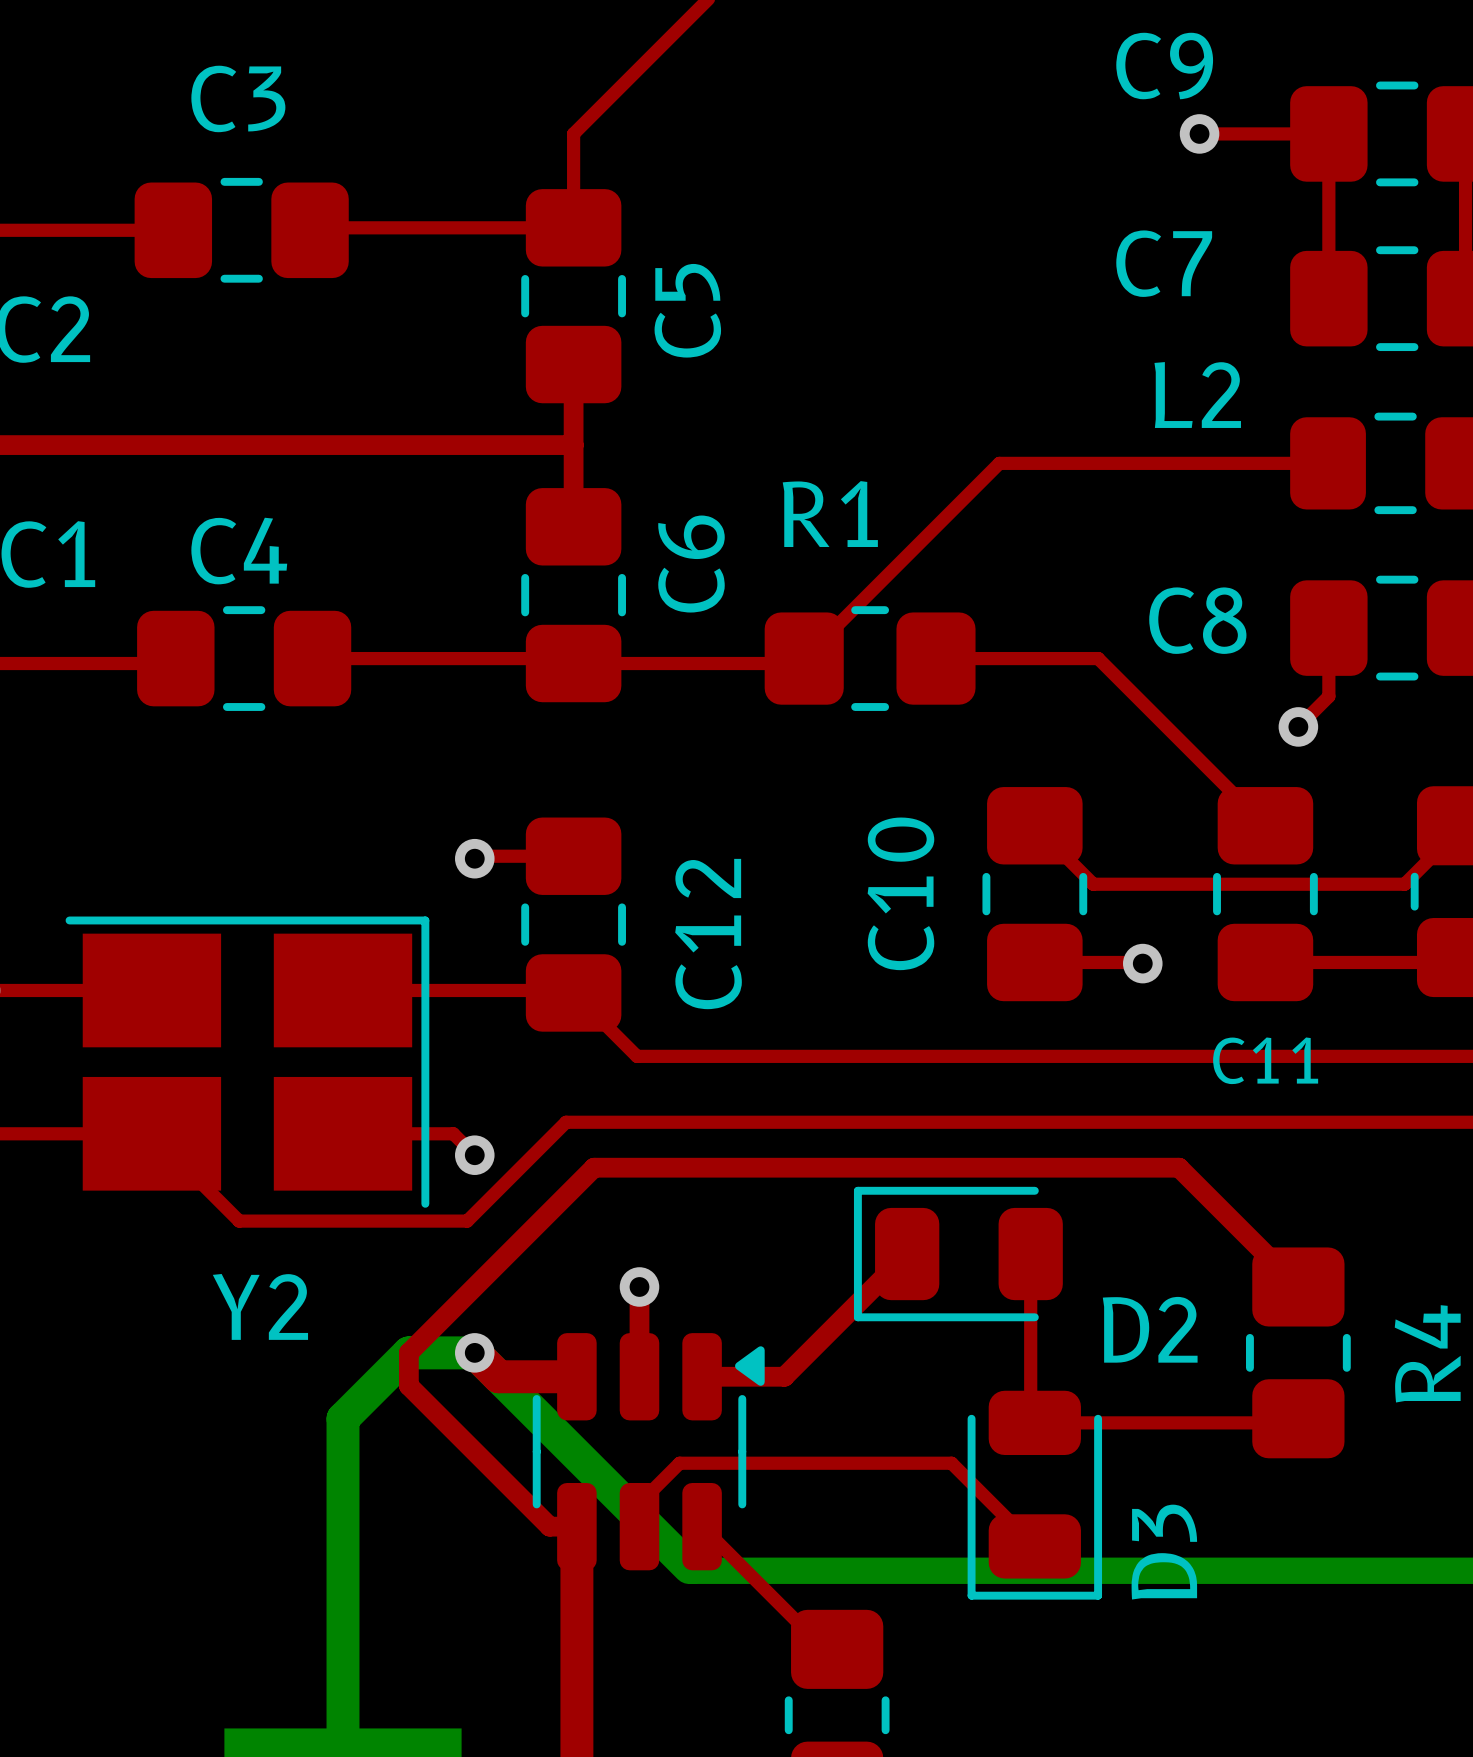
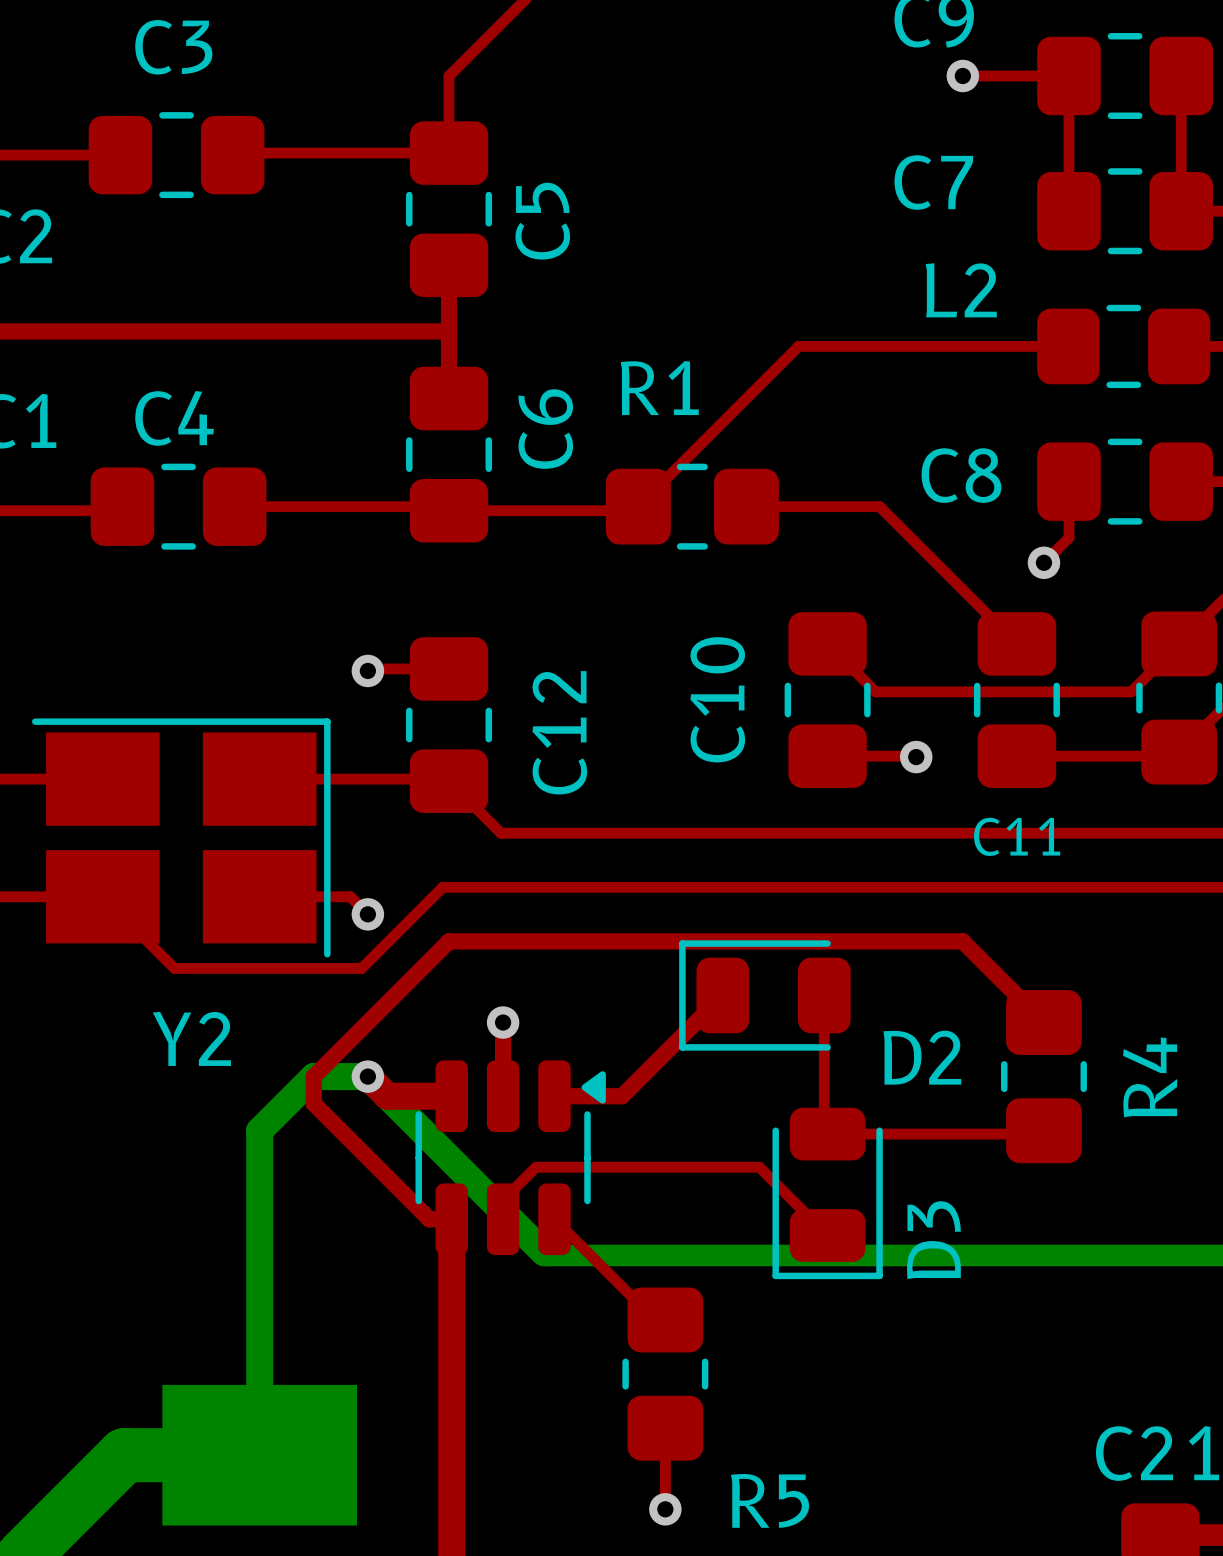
top track: (573, 1188) (594, 1167) (1179, 1167) (1199, 1188) -> (449, 941) (962, 941)

